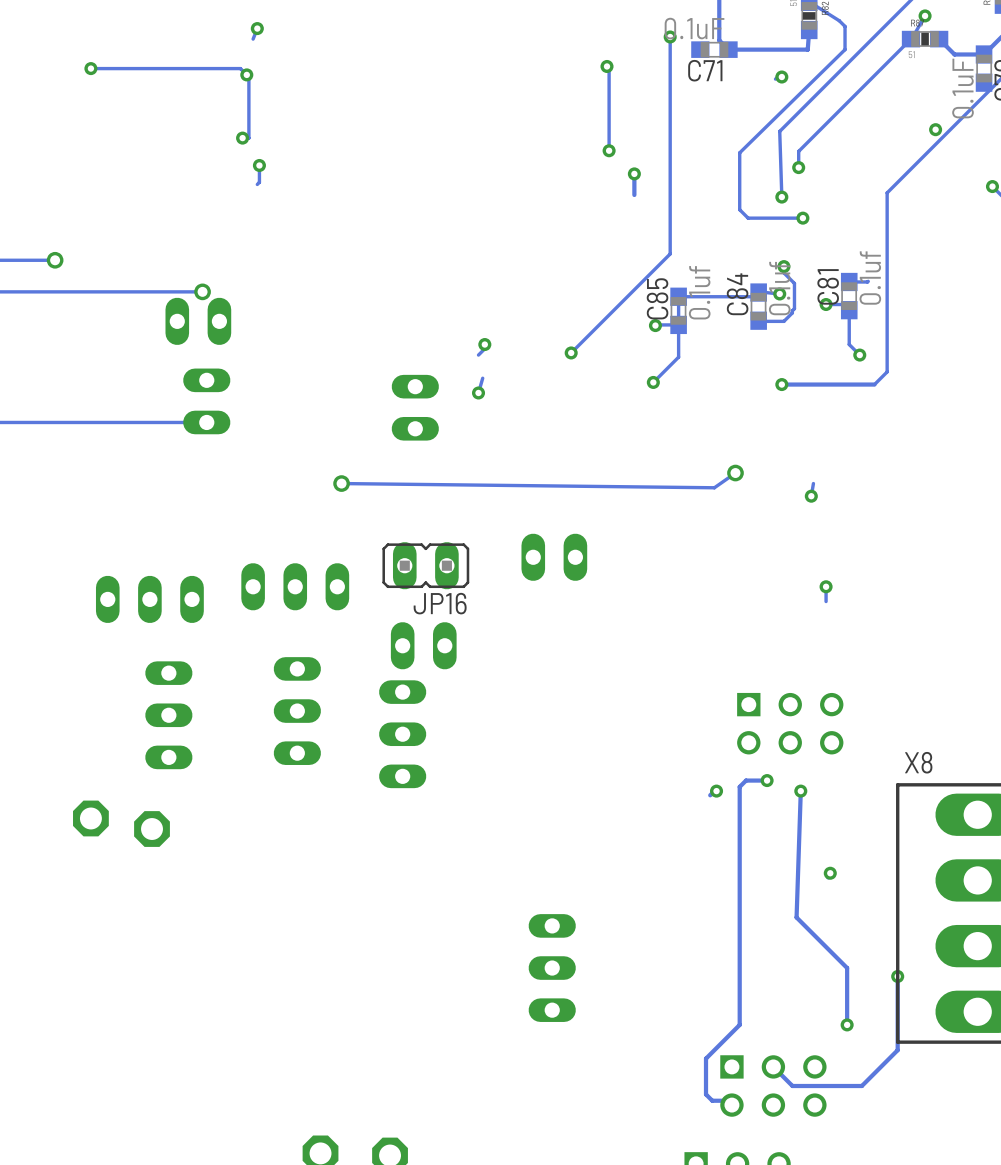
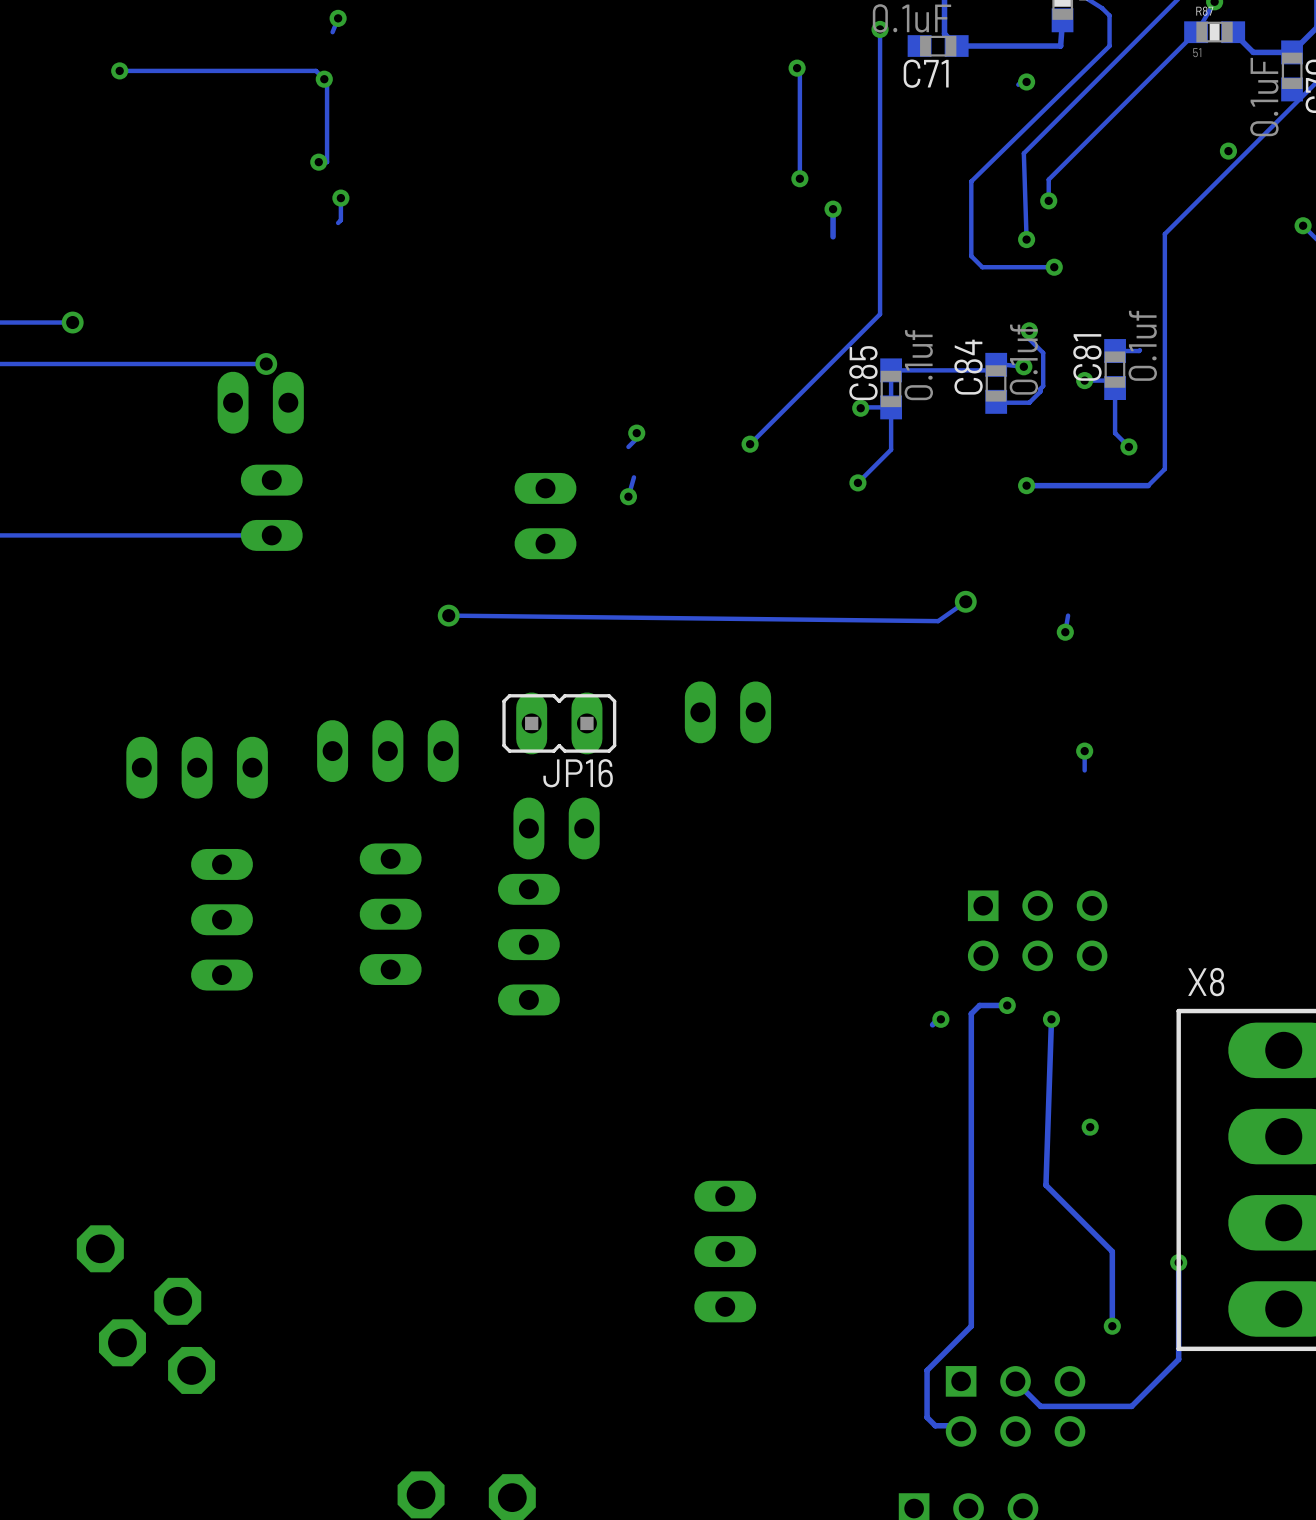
part: (90, 818) -> none
part: (152, 829) -> none
part: none -> (100, 1248)
part: none -> (177, 1301)
part: none -> (122, 1342)
part: none -> (191, 1370)

